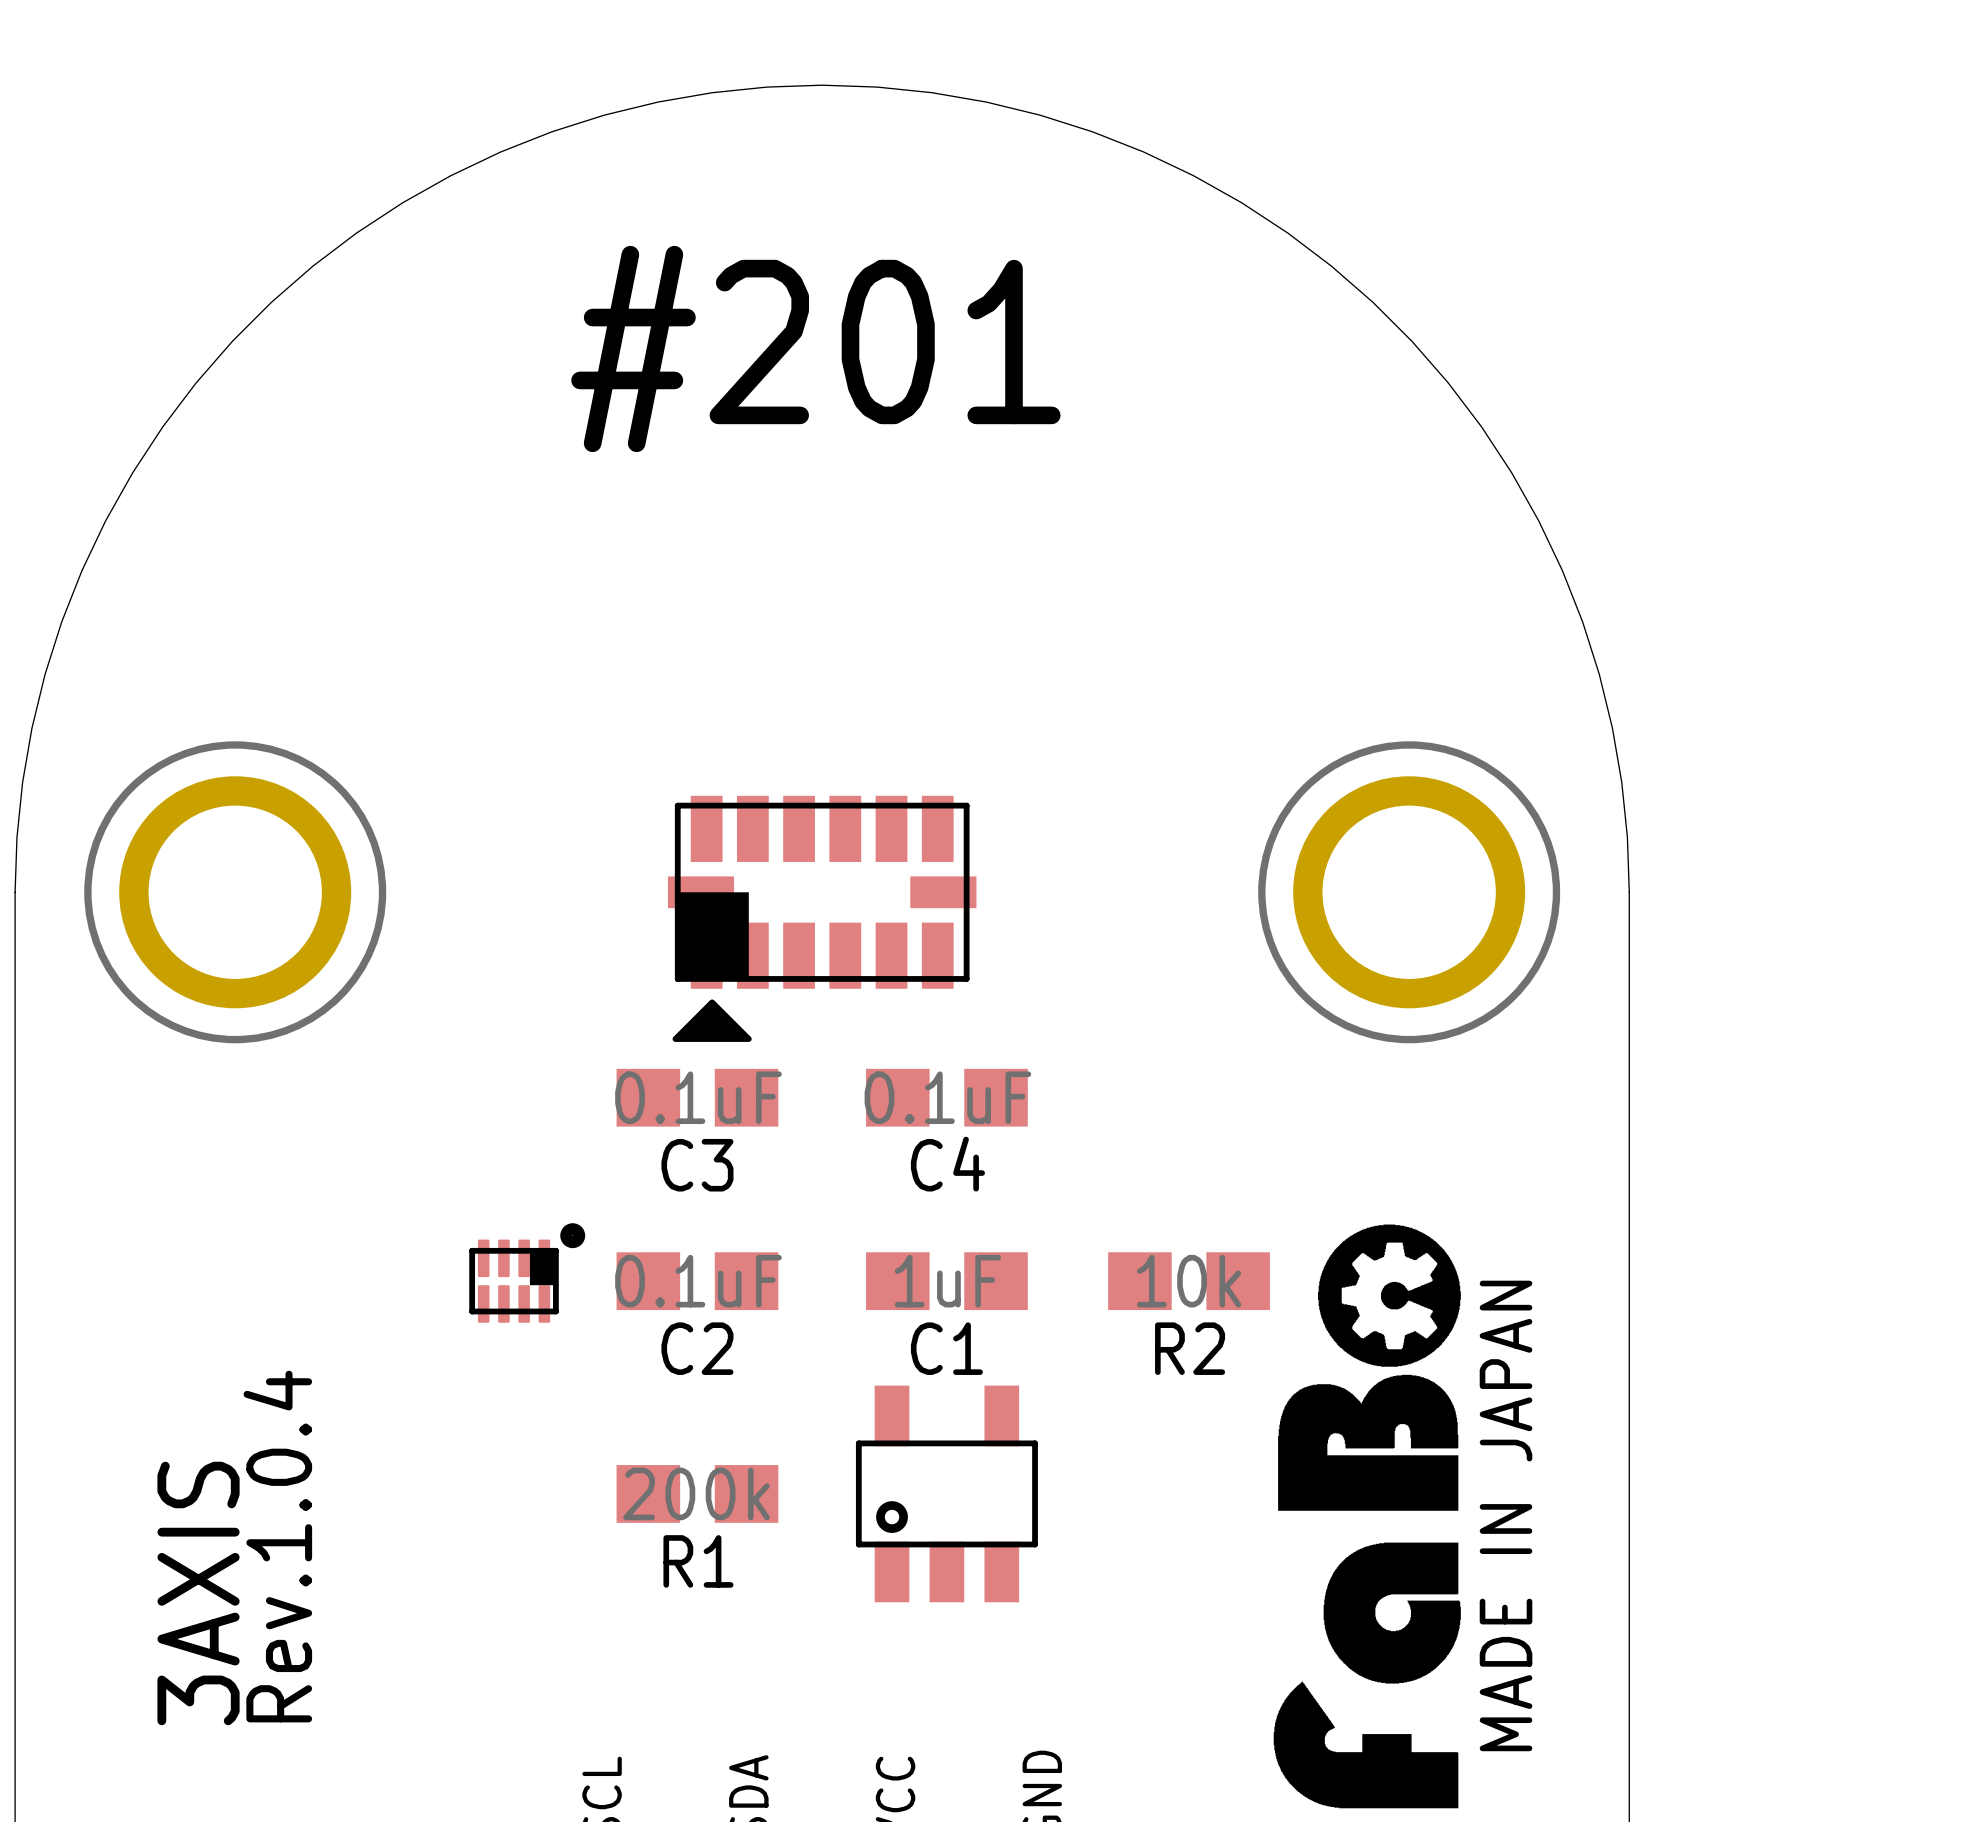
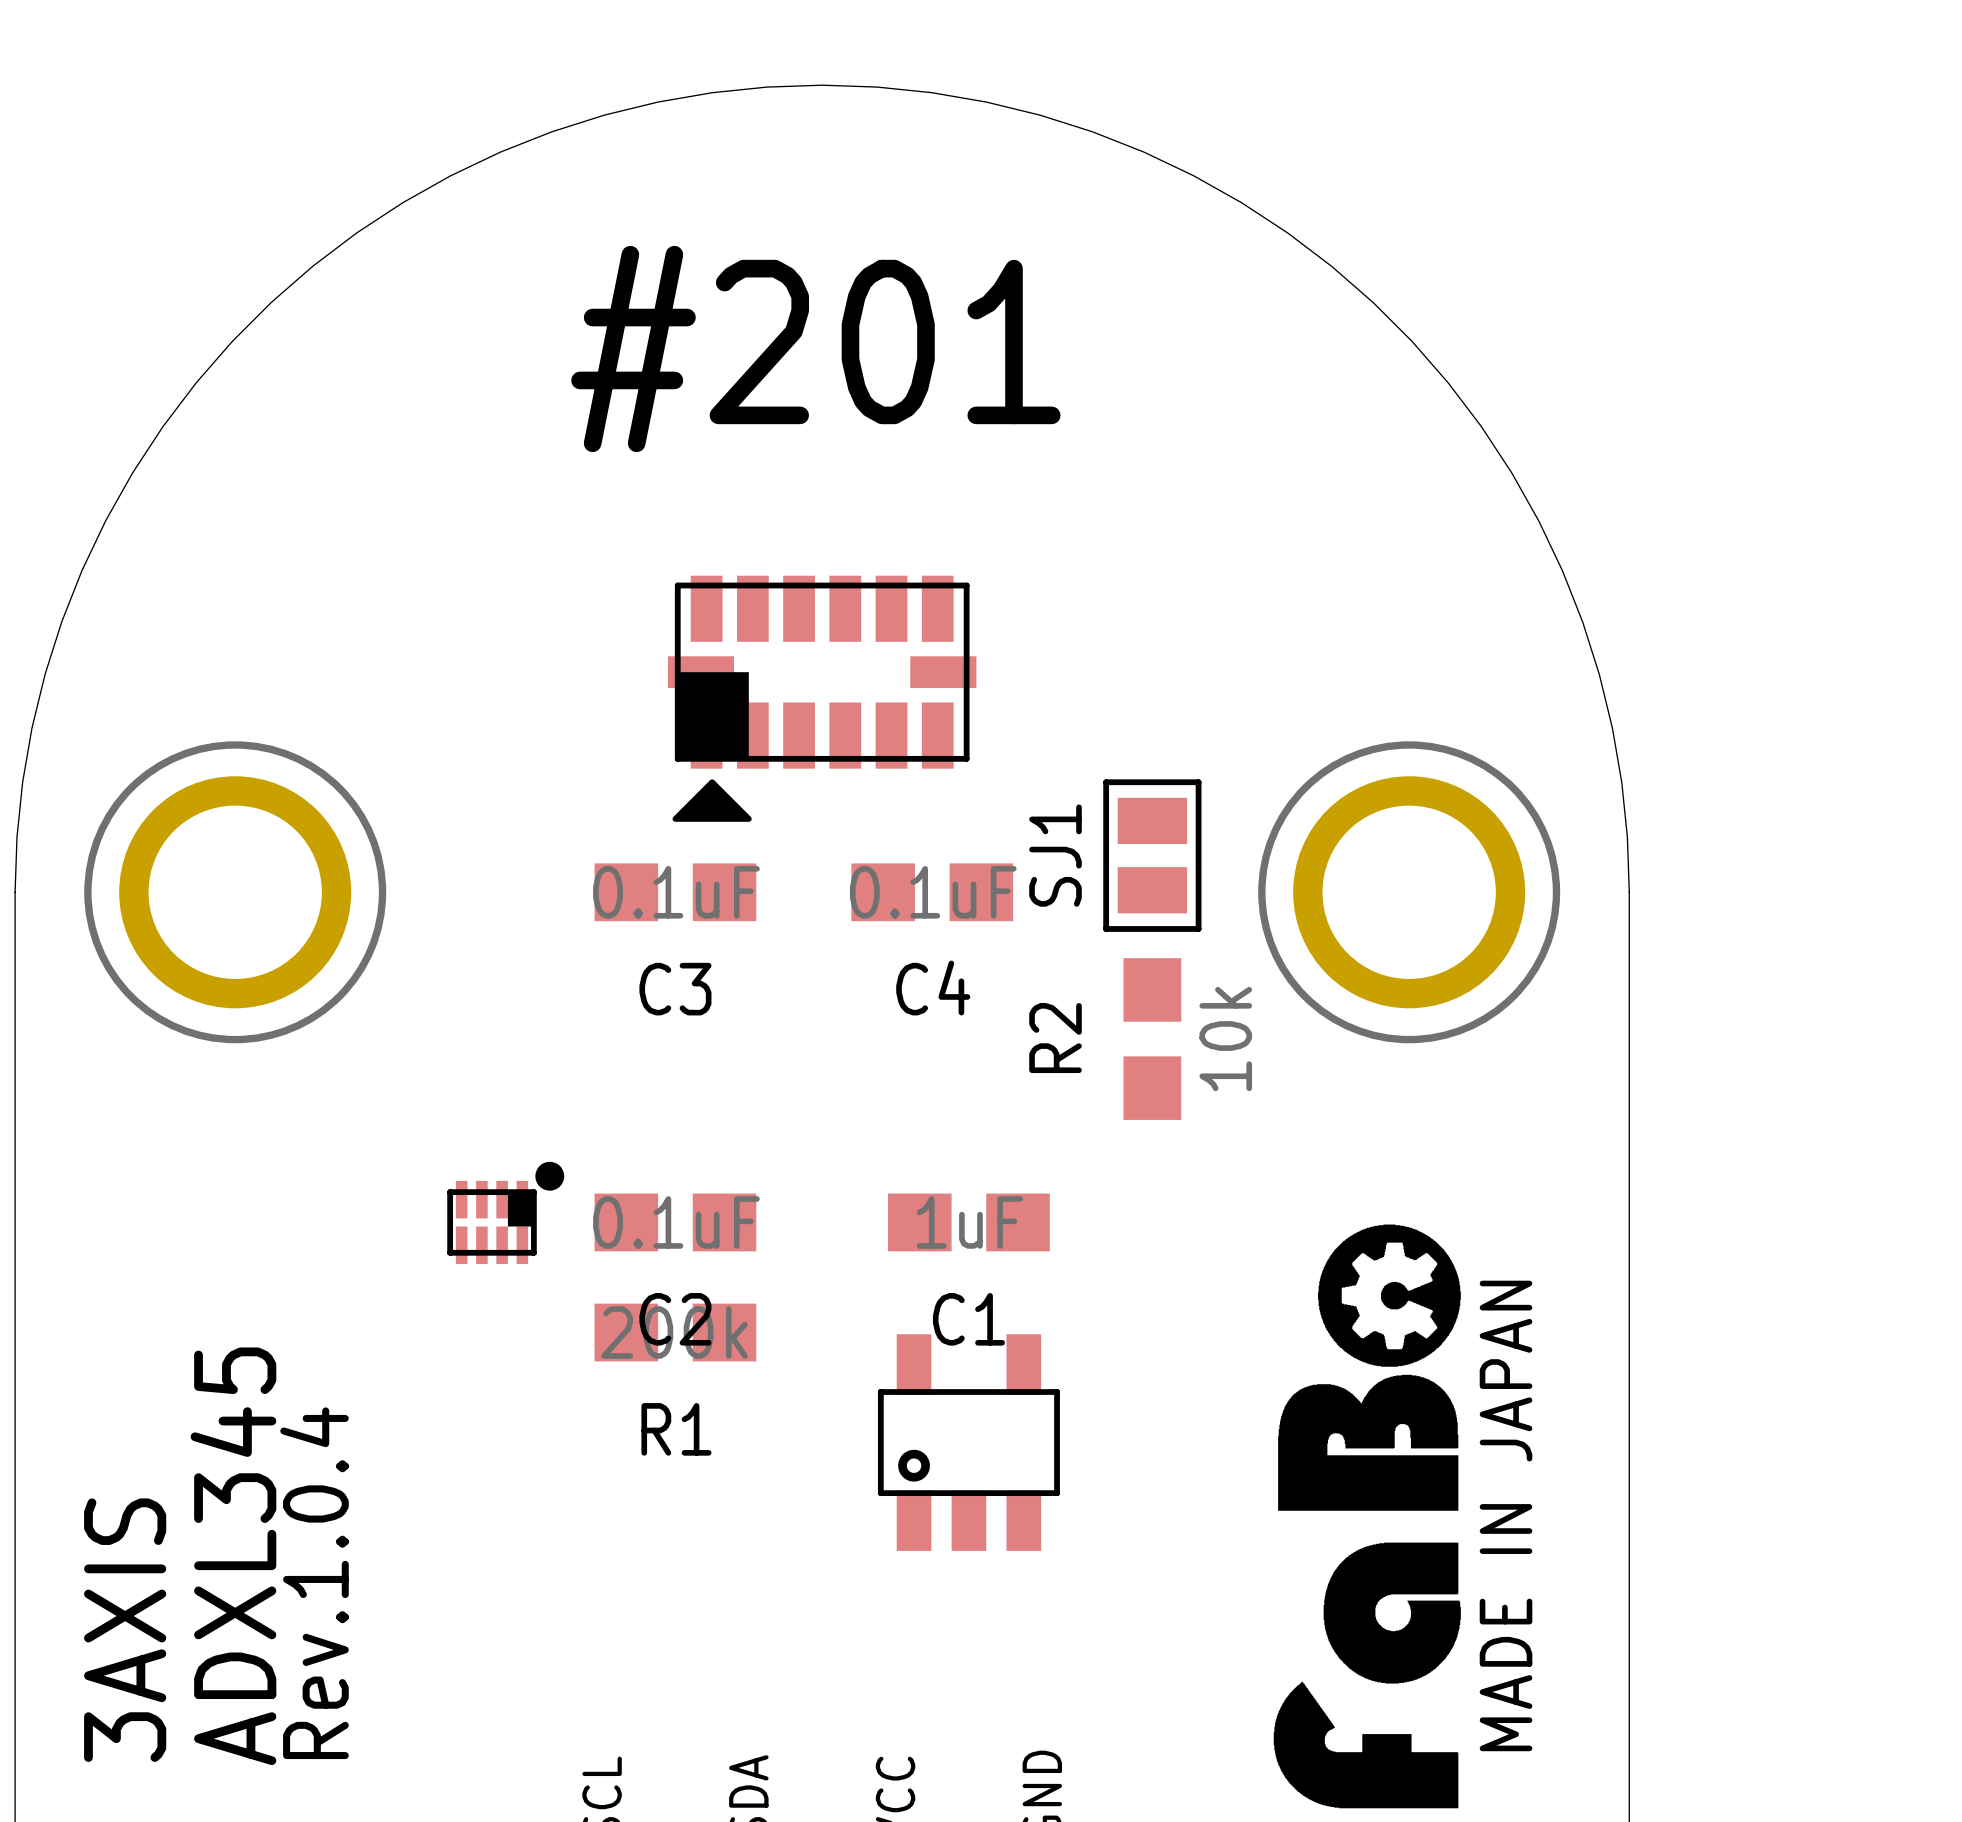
SJ1: none -> (1152, 855)
part position: (822, 918) -> (822, 698)
C3 position: (697, 1097) -> (675, 892)
C4 position: (946, 1097) -> (932, 892)
C4 name position: C4 (947, 1164) -> C4 (933, 988)
C3 name position: C3 (697, 1165) -> C3 (675, 989)
part: none -> (505, 1212)
part: (527, 1272) -> none
C2 position: (697, 1281) -> (675, 1222)
C1 position: (946, 1281) -> (968, 1222)
R2 rotation: 0° (1189, 1281) -> 90° clockwise (1152, 1039)
R2 position: (1189, 1281) -> (1152, 1039)
C2 name position: C2 (697, 1348) -> C2 (675, 1319)
C1 name position: C1 (946, 1348) -> C1 (968, 1319)
R1 position: (697, 1493) -> (675, 1332)
part position: (946, 1493) -> (968, 1442)
text position: Rev.1.0.4 (277, 1546) -> Rev.1.0.4 (314, 1583)
text: none -> ADXL345 (233, 1556)
R1 name position: R1 (698, 1561) -> R1 (676, 1429)
text position: 3AXIS (198, 1593) -> 3AXIS (125, 1630)

